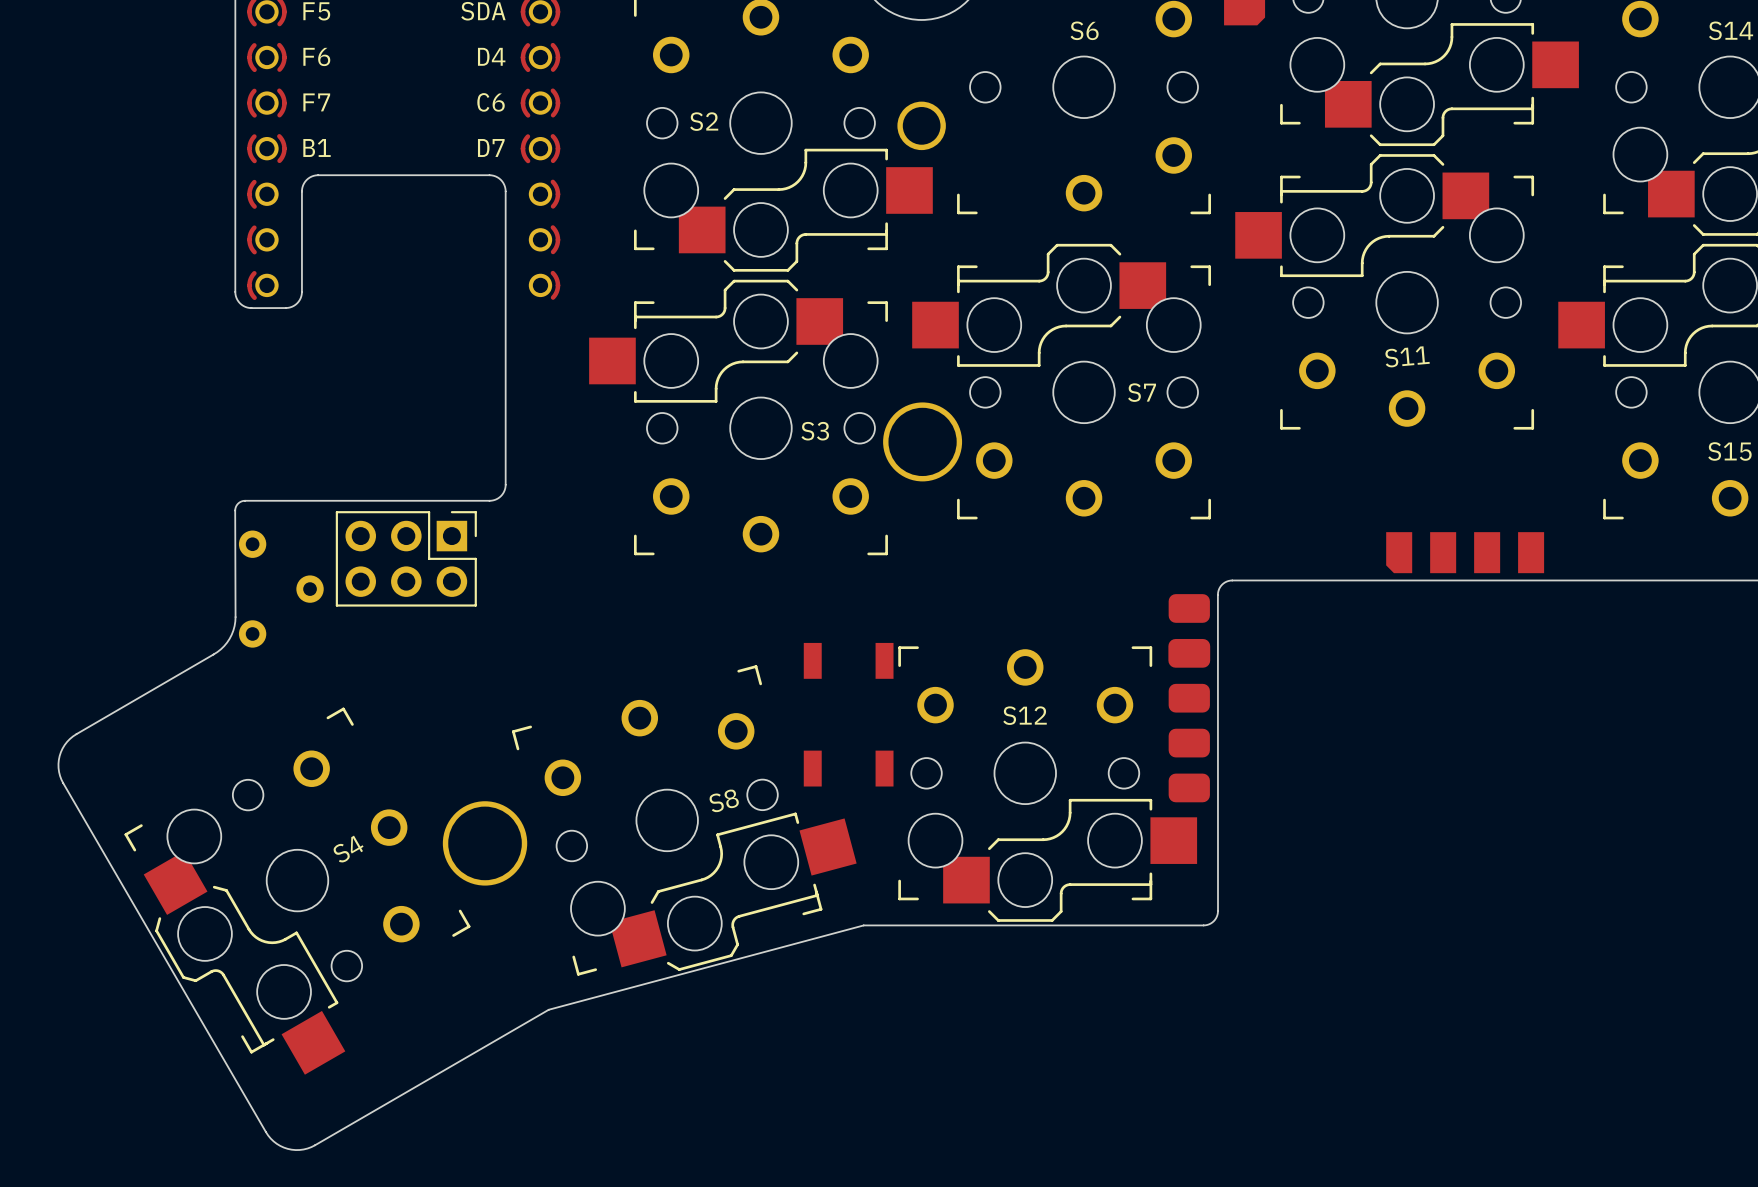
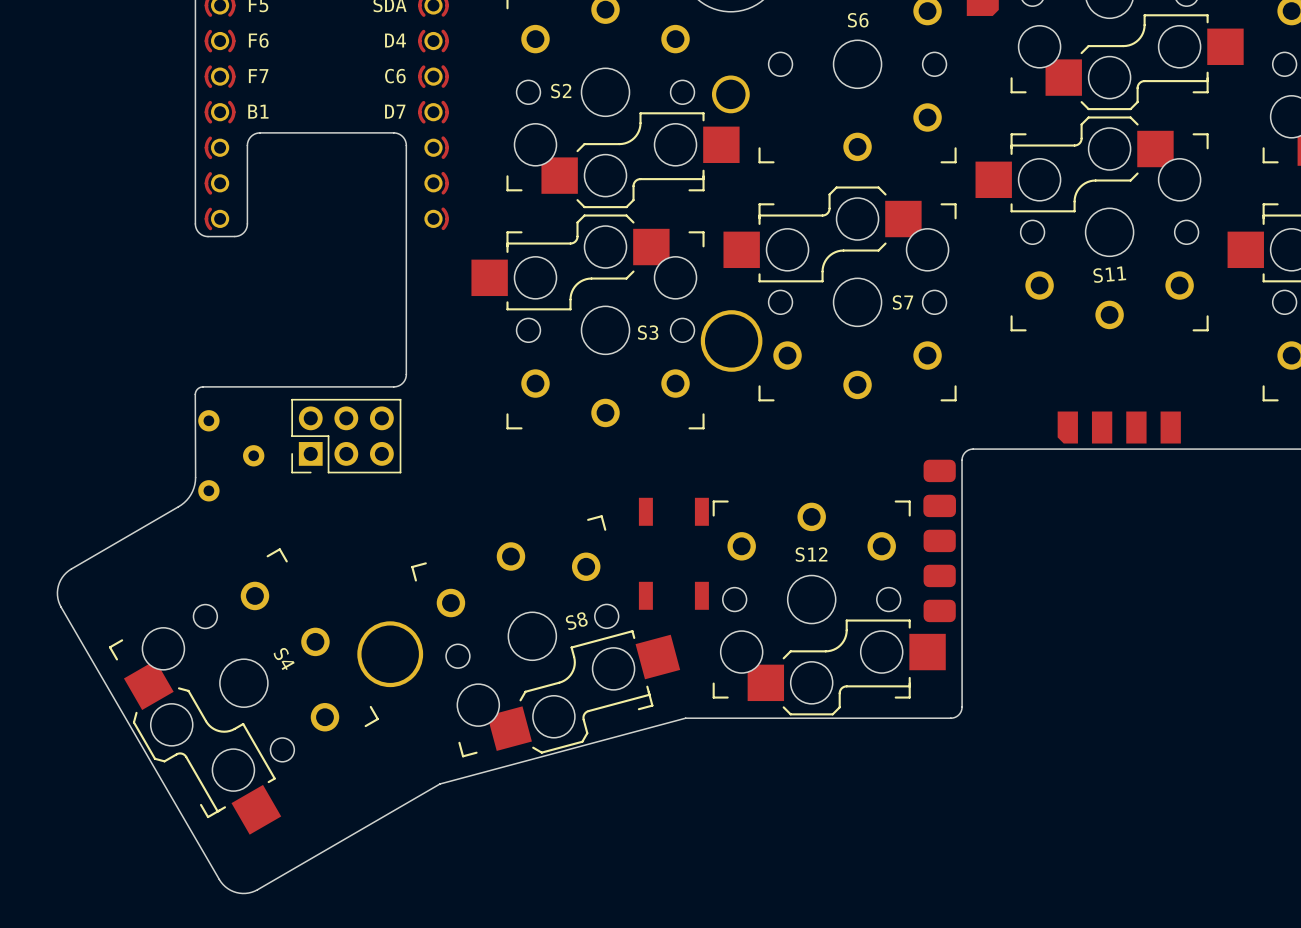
part position: (1465, 552) -> (1119, 427)
part rotation: 0° (406, 558) -> 180° (346, 436)
S4 name rotation: 0° (348, 849) -> 90° clockwise (284, 658)

